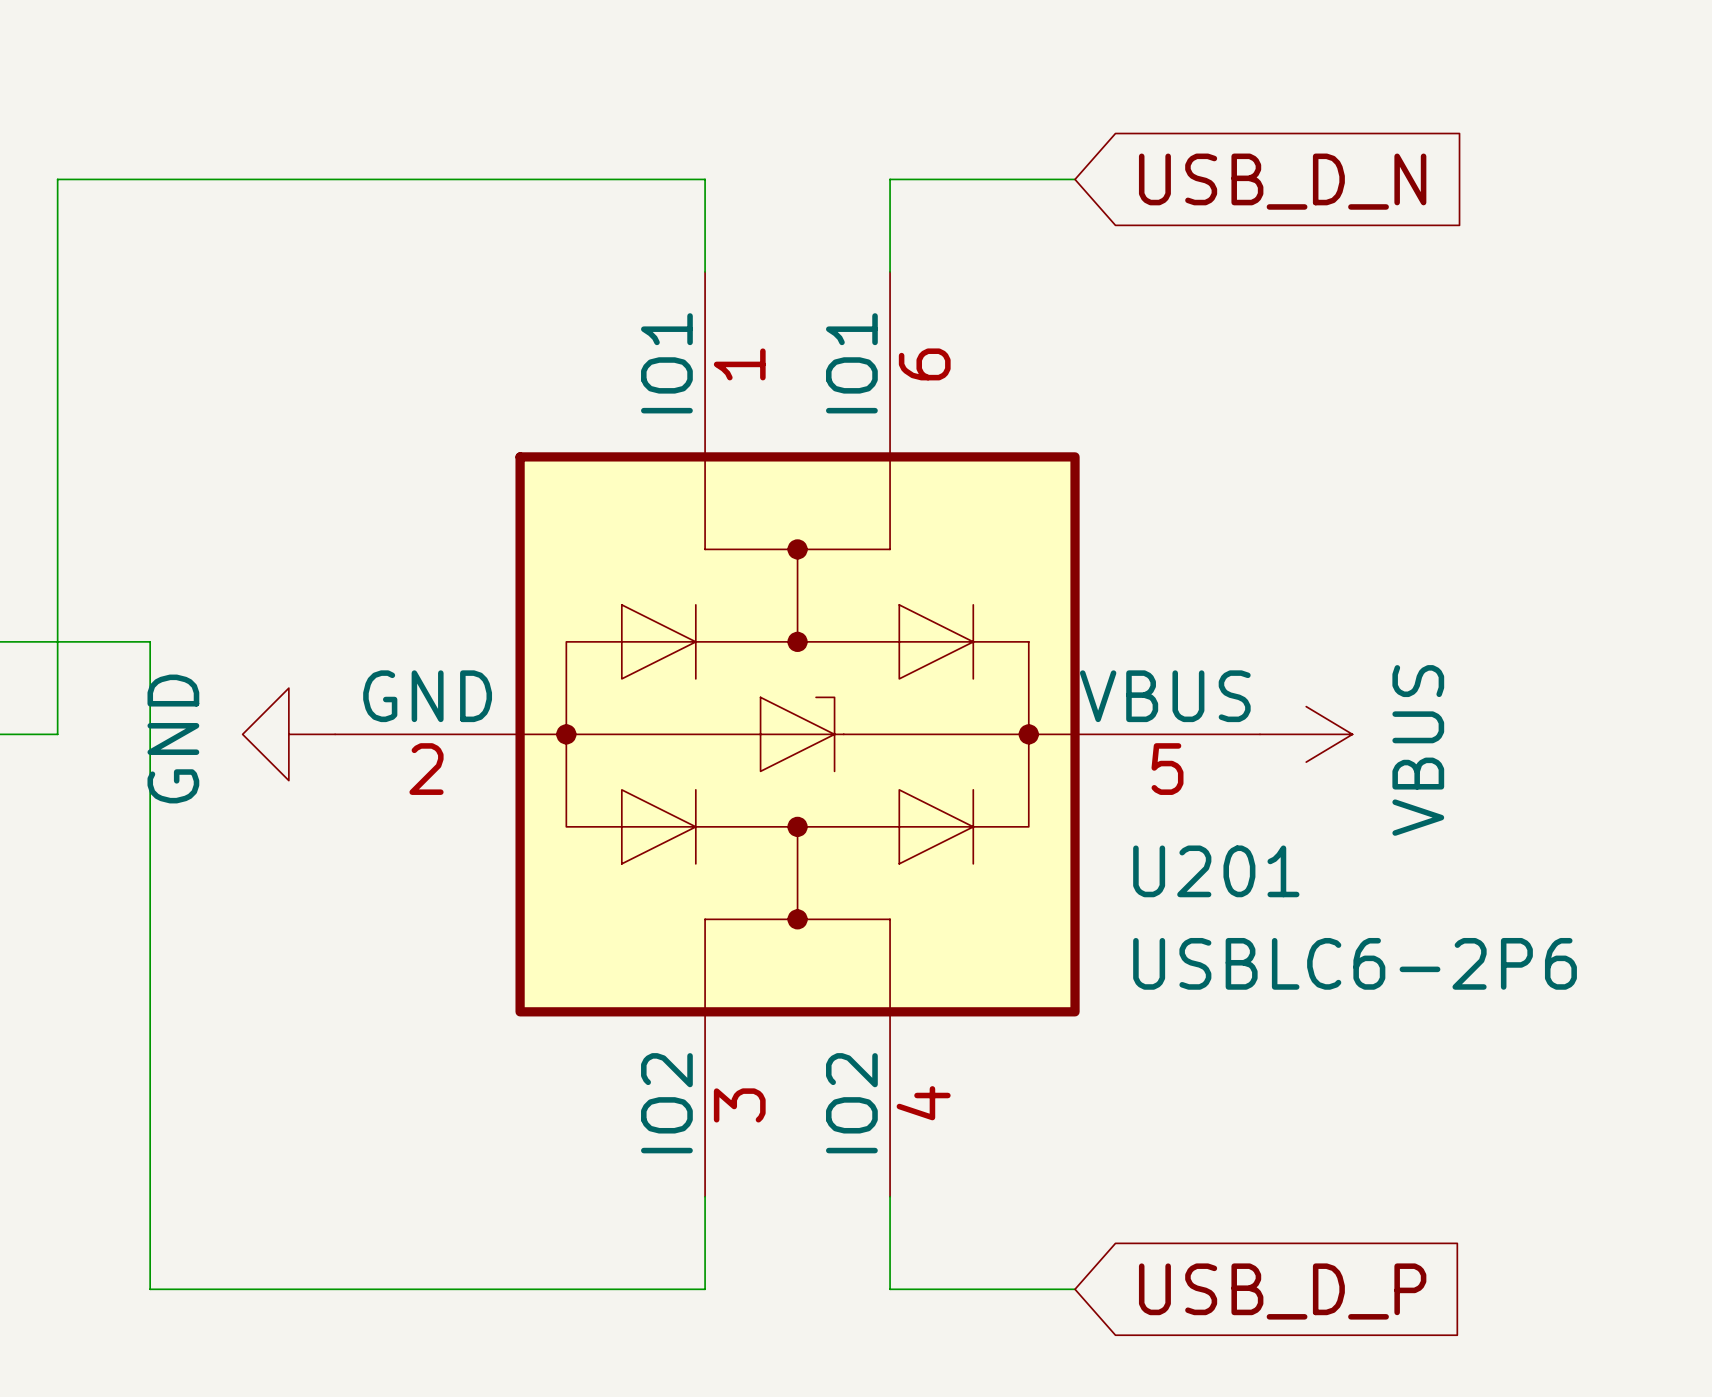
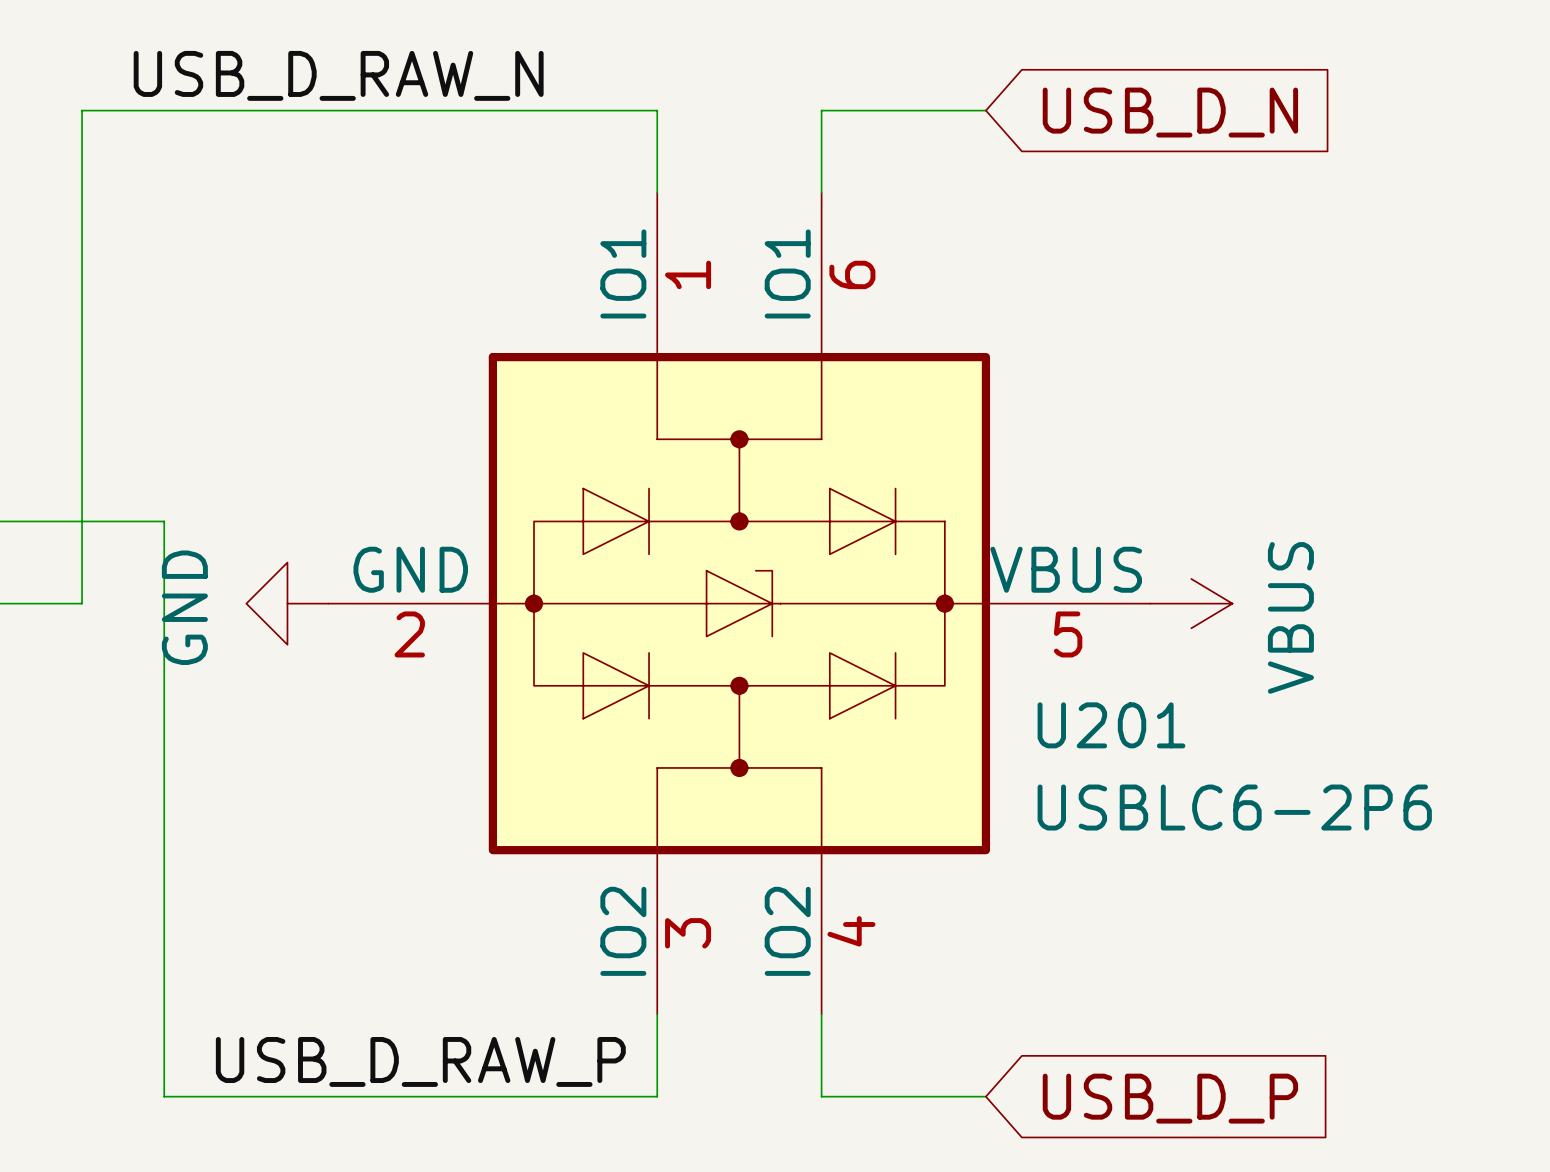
label: none -> USB_D_RAW_N (338, 75)
label: none -> USB_D_RAW_P (420, 1061)

